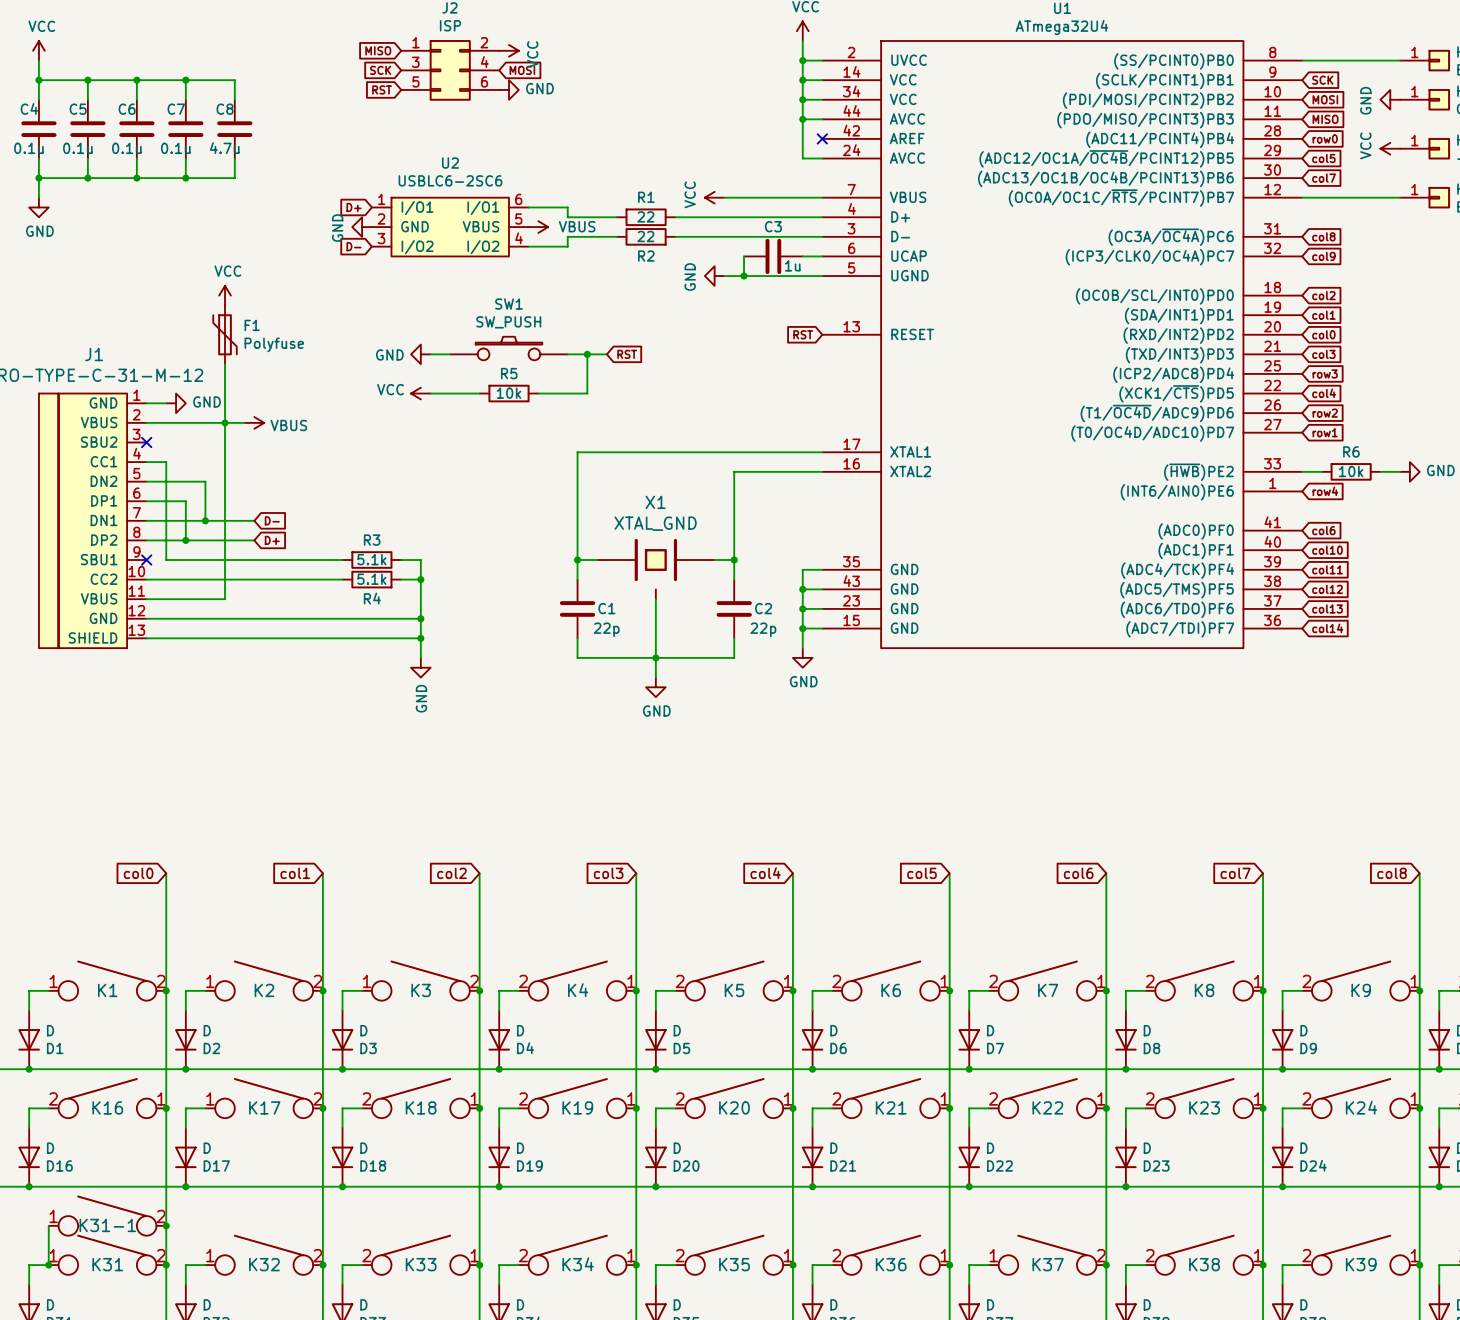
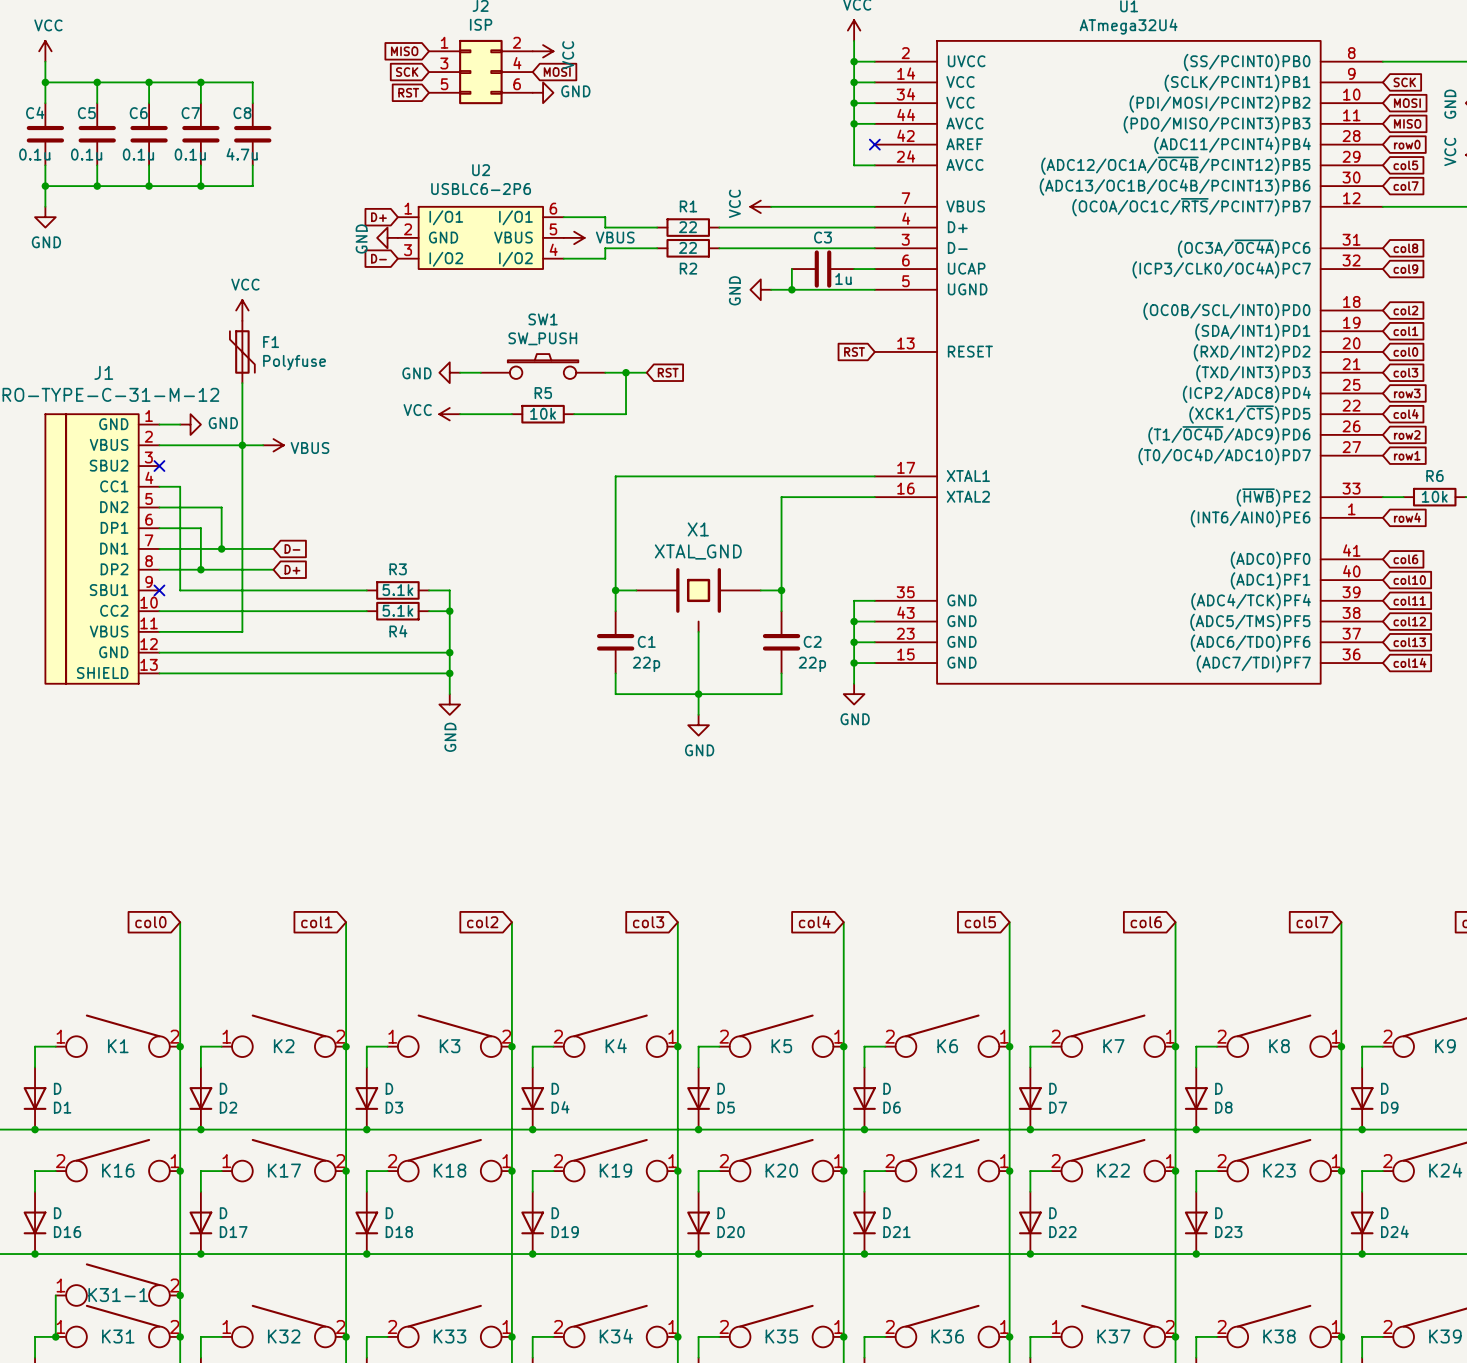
U2 value: USBLC6-2SC6 (450, 180) -> USBLC6-2P6 (481, 189)

